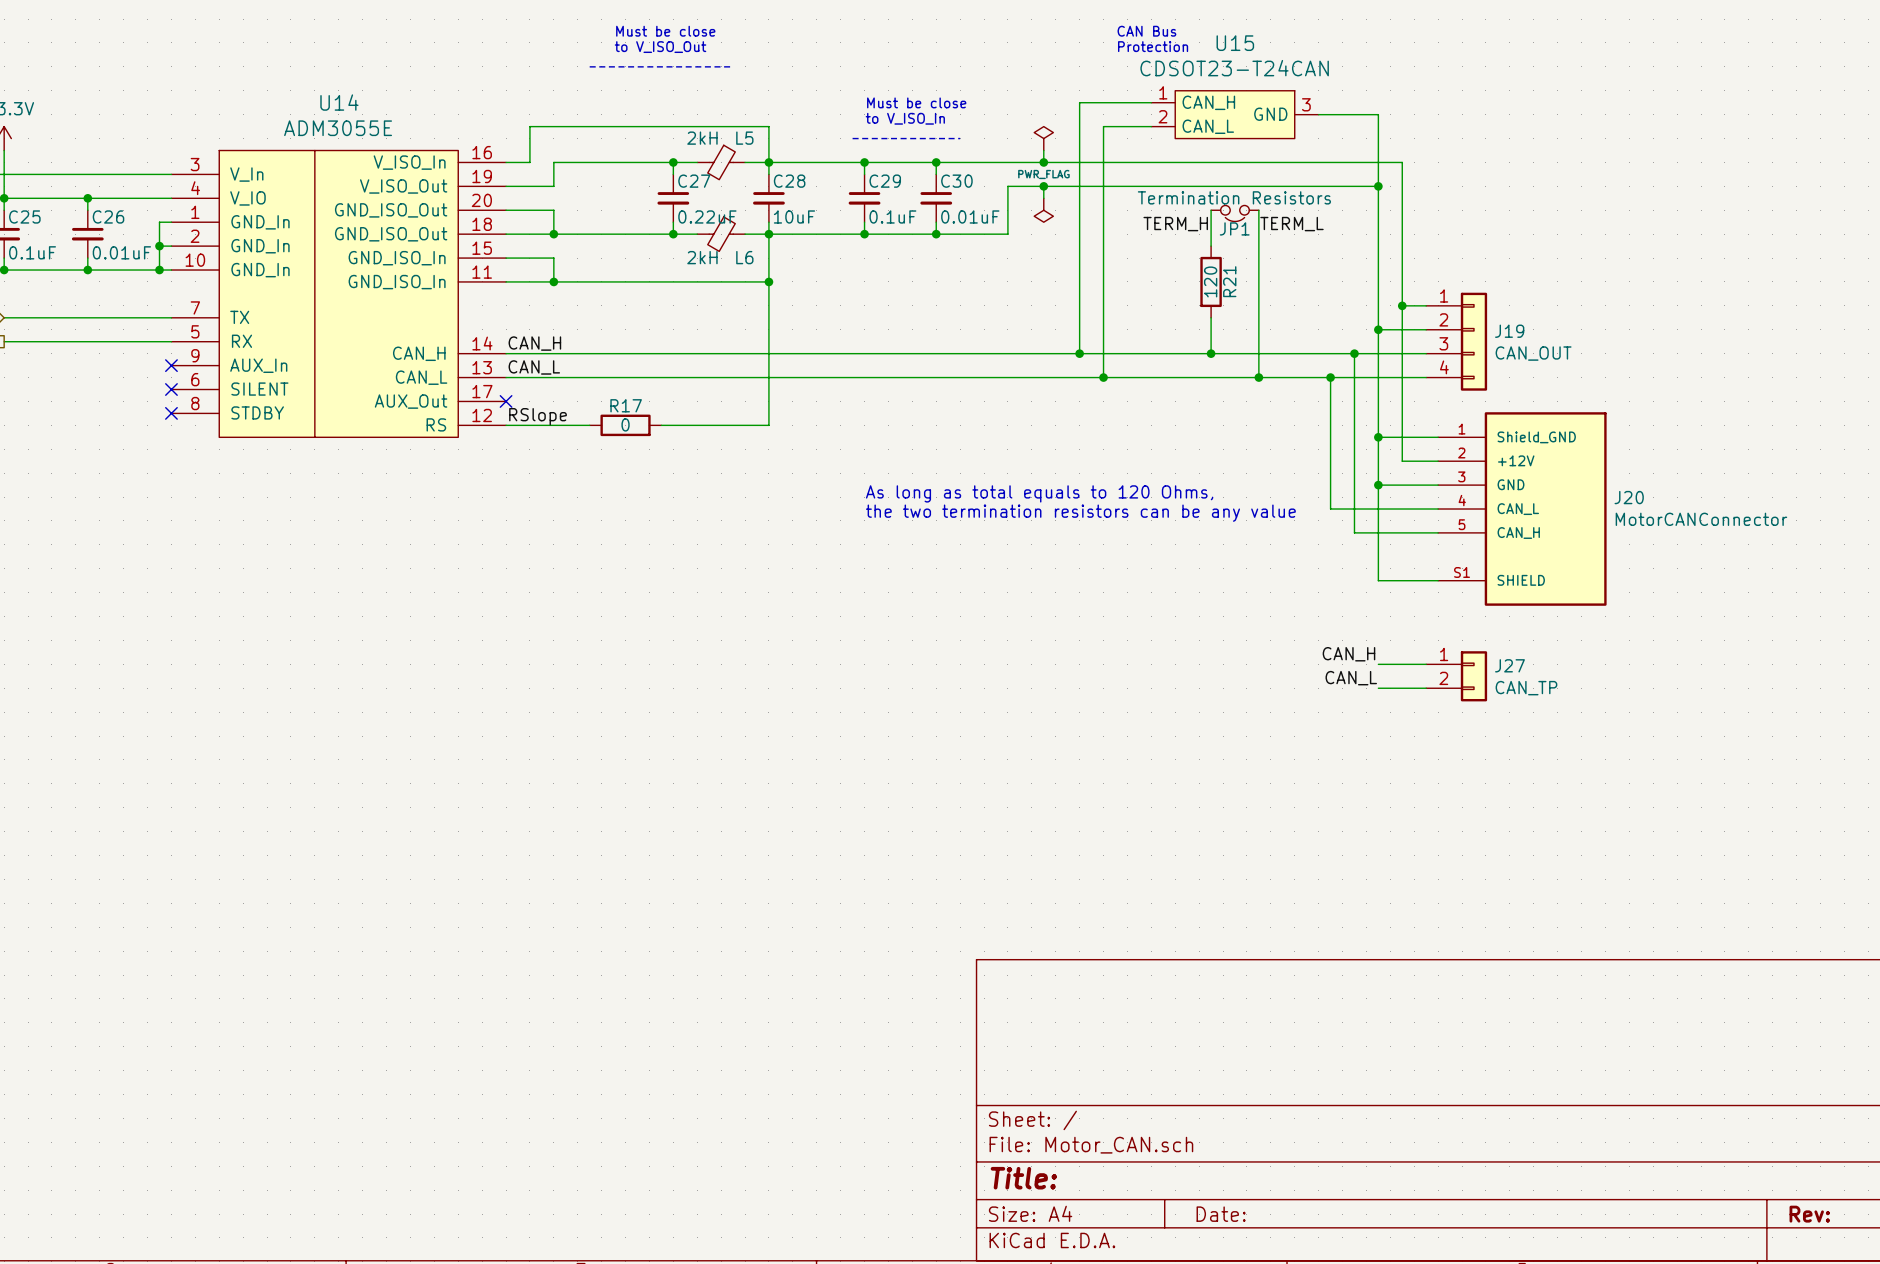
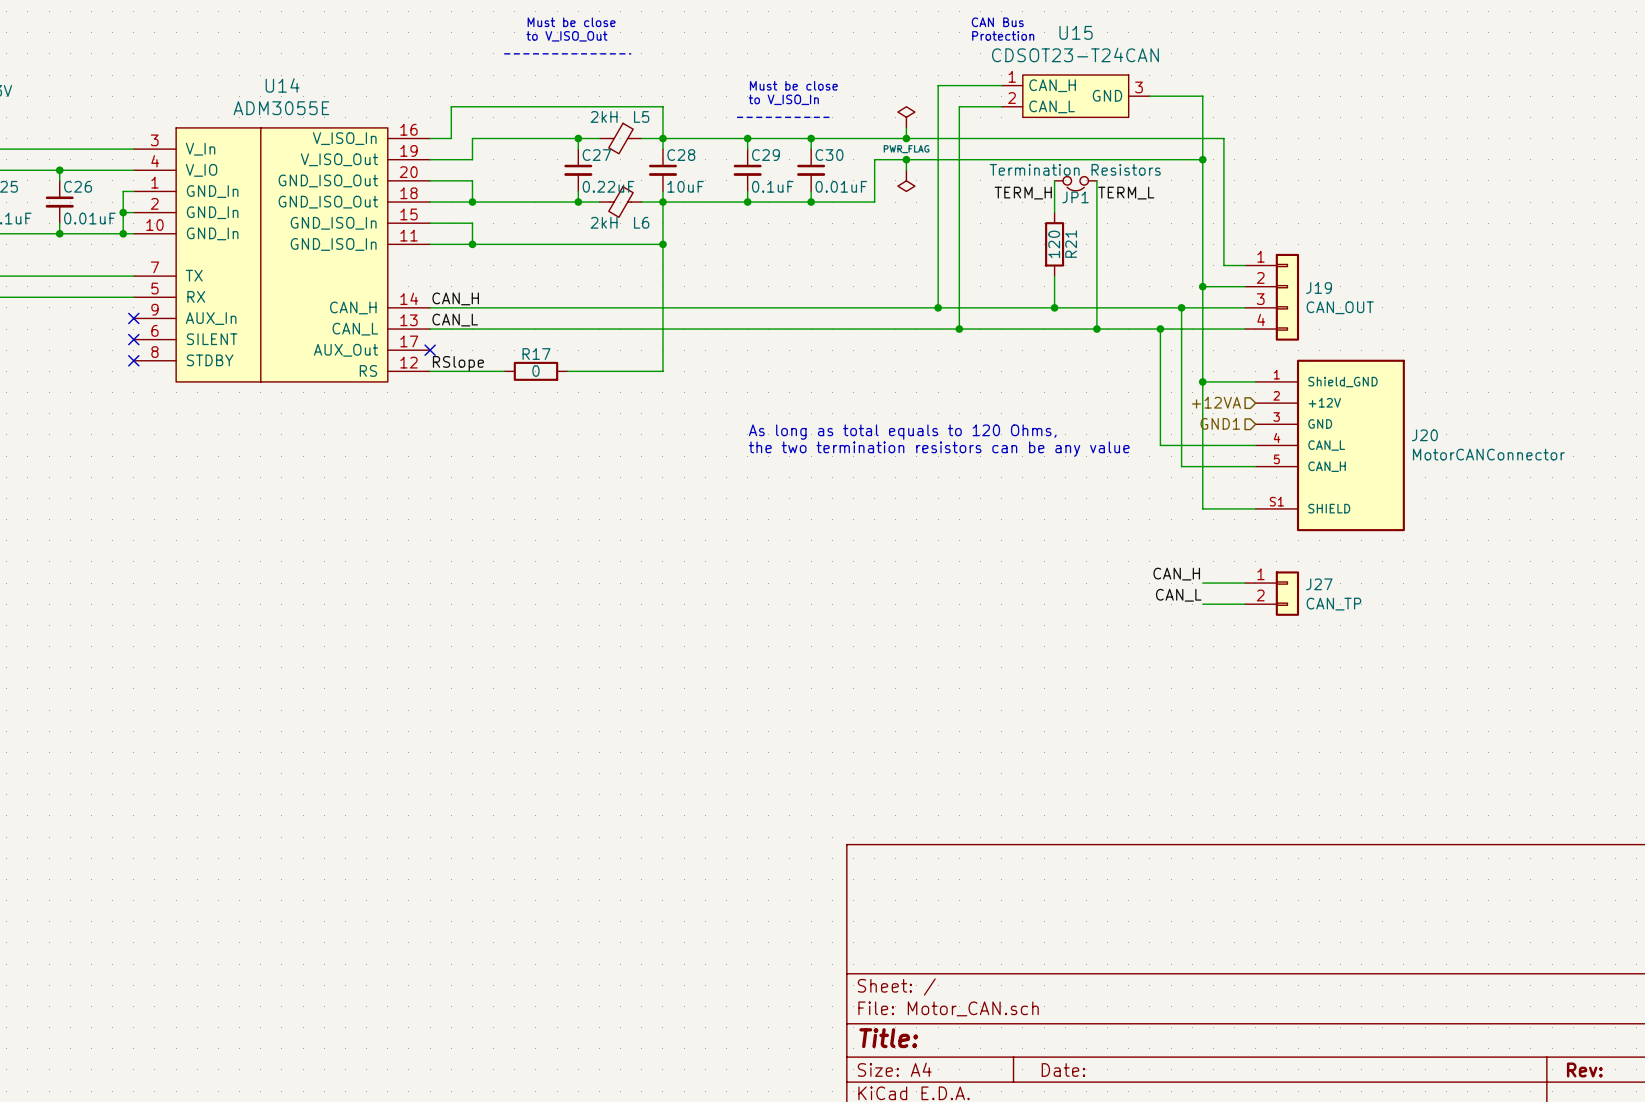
wire: (1402, 305) (1402, 461) (1438, 461) -> none
junction: (1402, 305) -> none
hierarchical label: none -> +12VA (1216, 402)
hierarchical label: none -> GND1 (1220, 423)
wire: (1378, 485) (1438, 485) -> none
junction: (1378, 485) -> none

